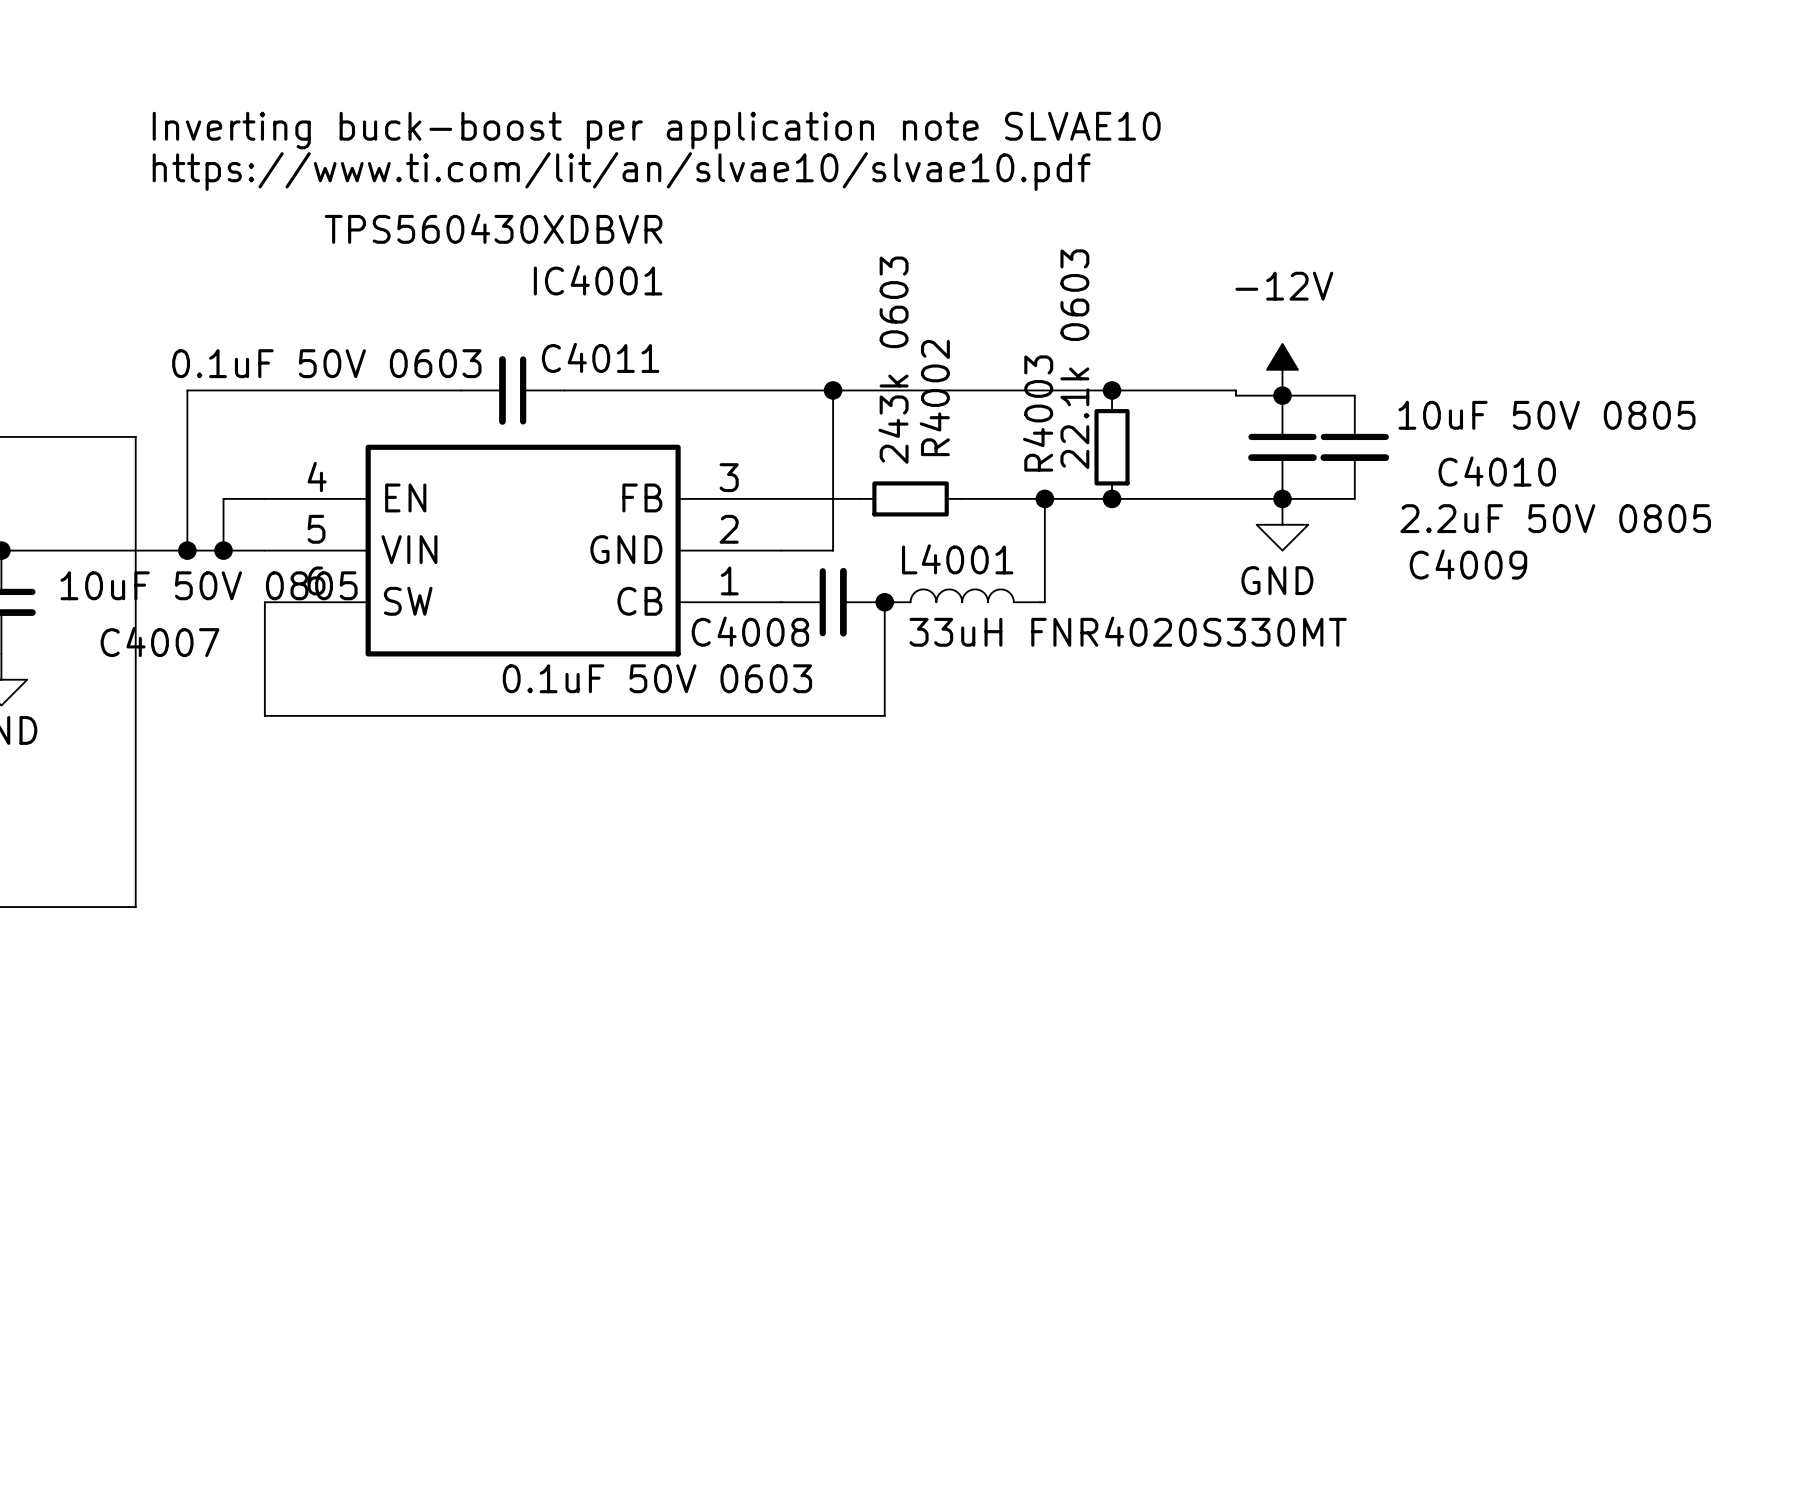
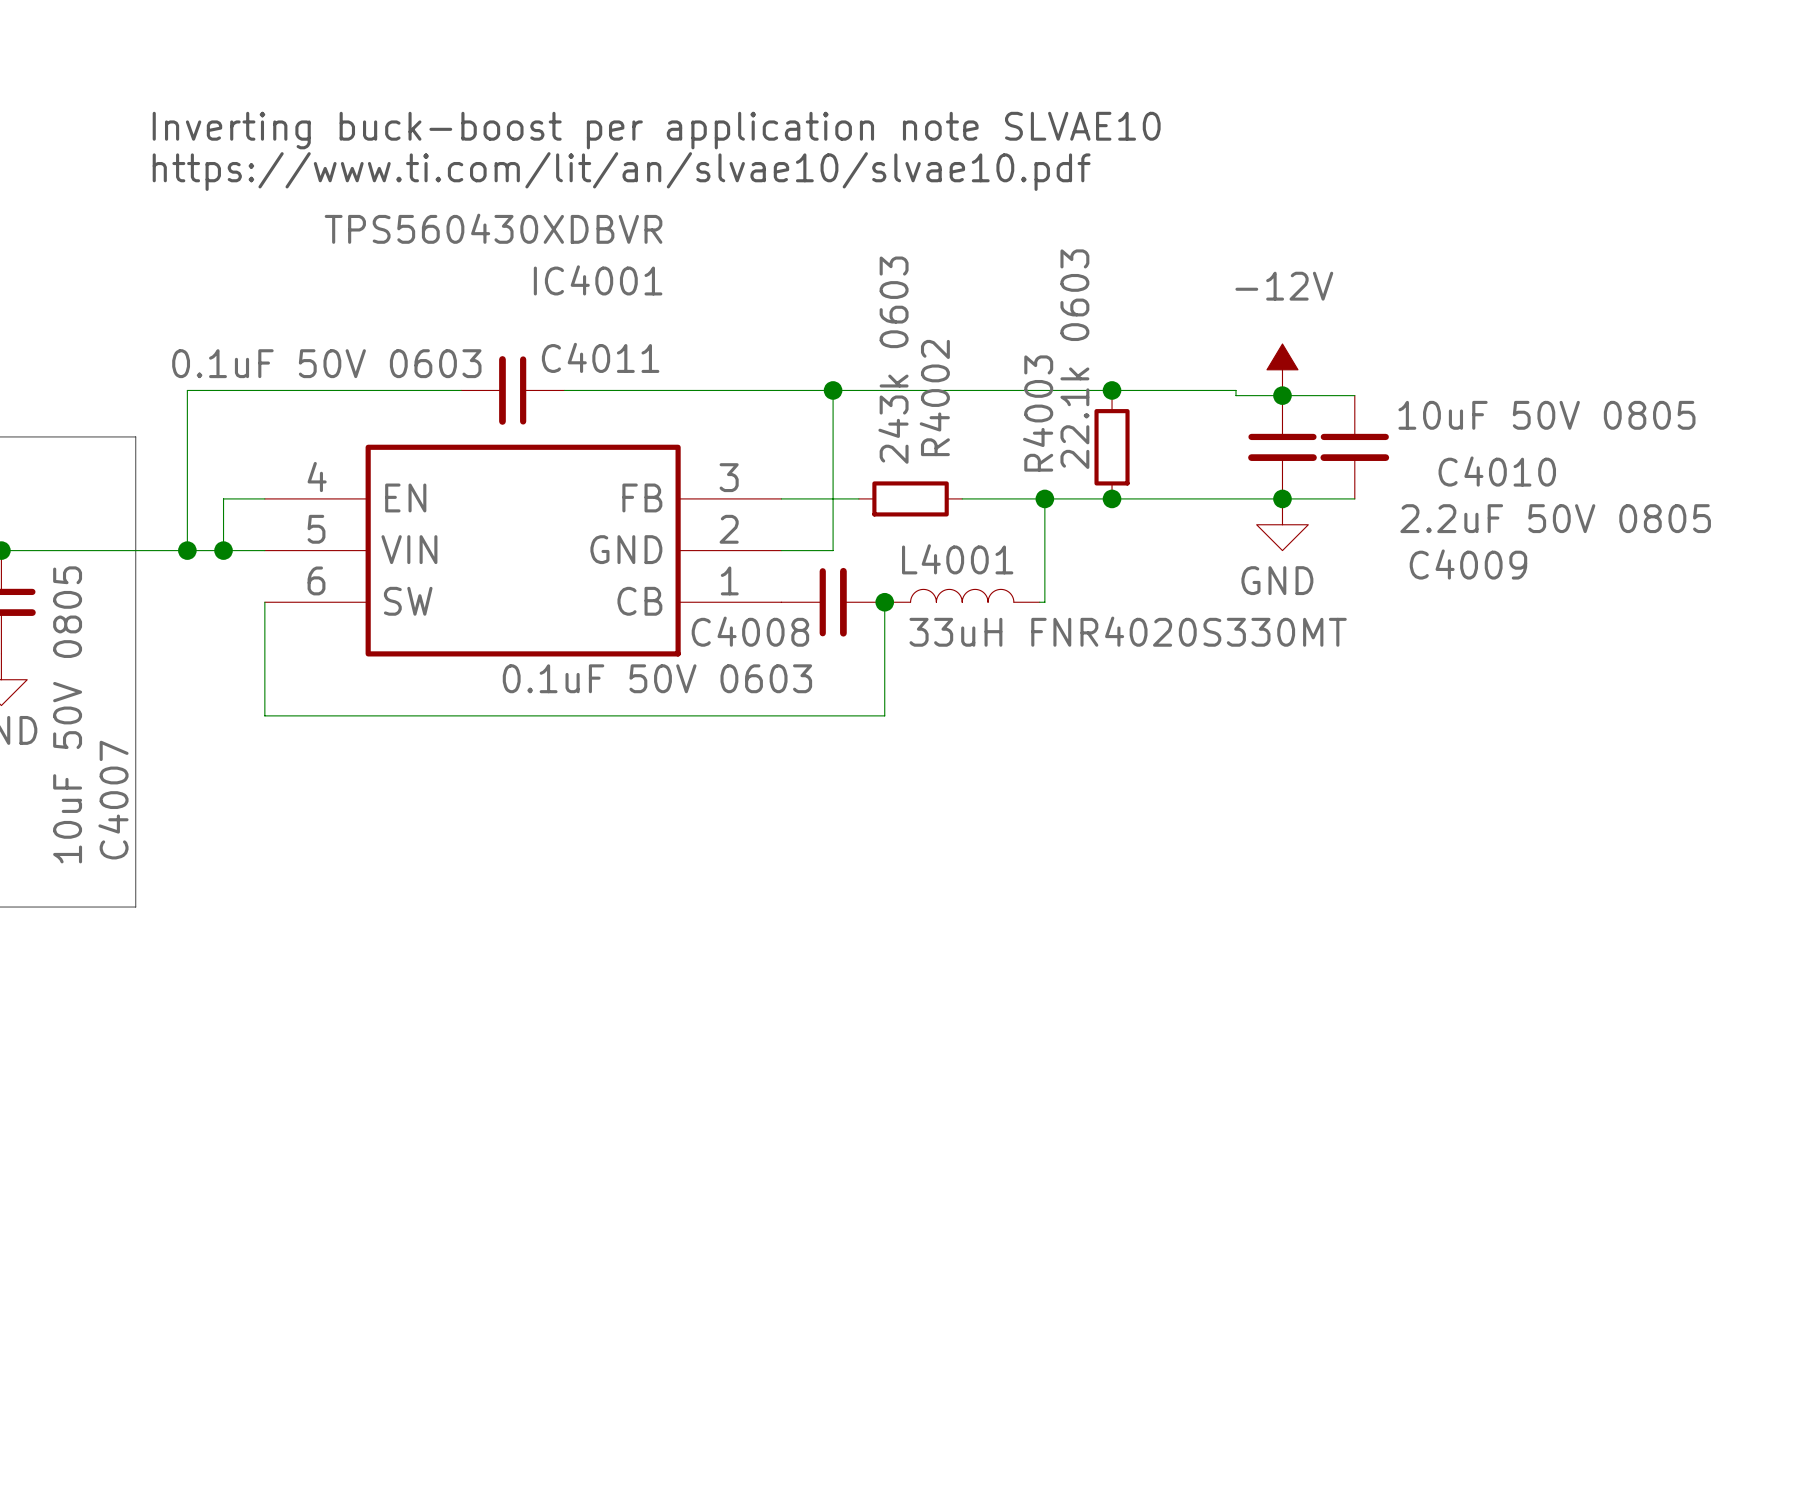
C4007 value rotation: 0° (209, 585) -> 90° counterclockwise (67, 714)
C4007 name rotation: 0° (160, 641) -> 90° counterclockwise (113, 800)
C4007 name position: C4007 (160, 641) -> C4007 (113, 800)

